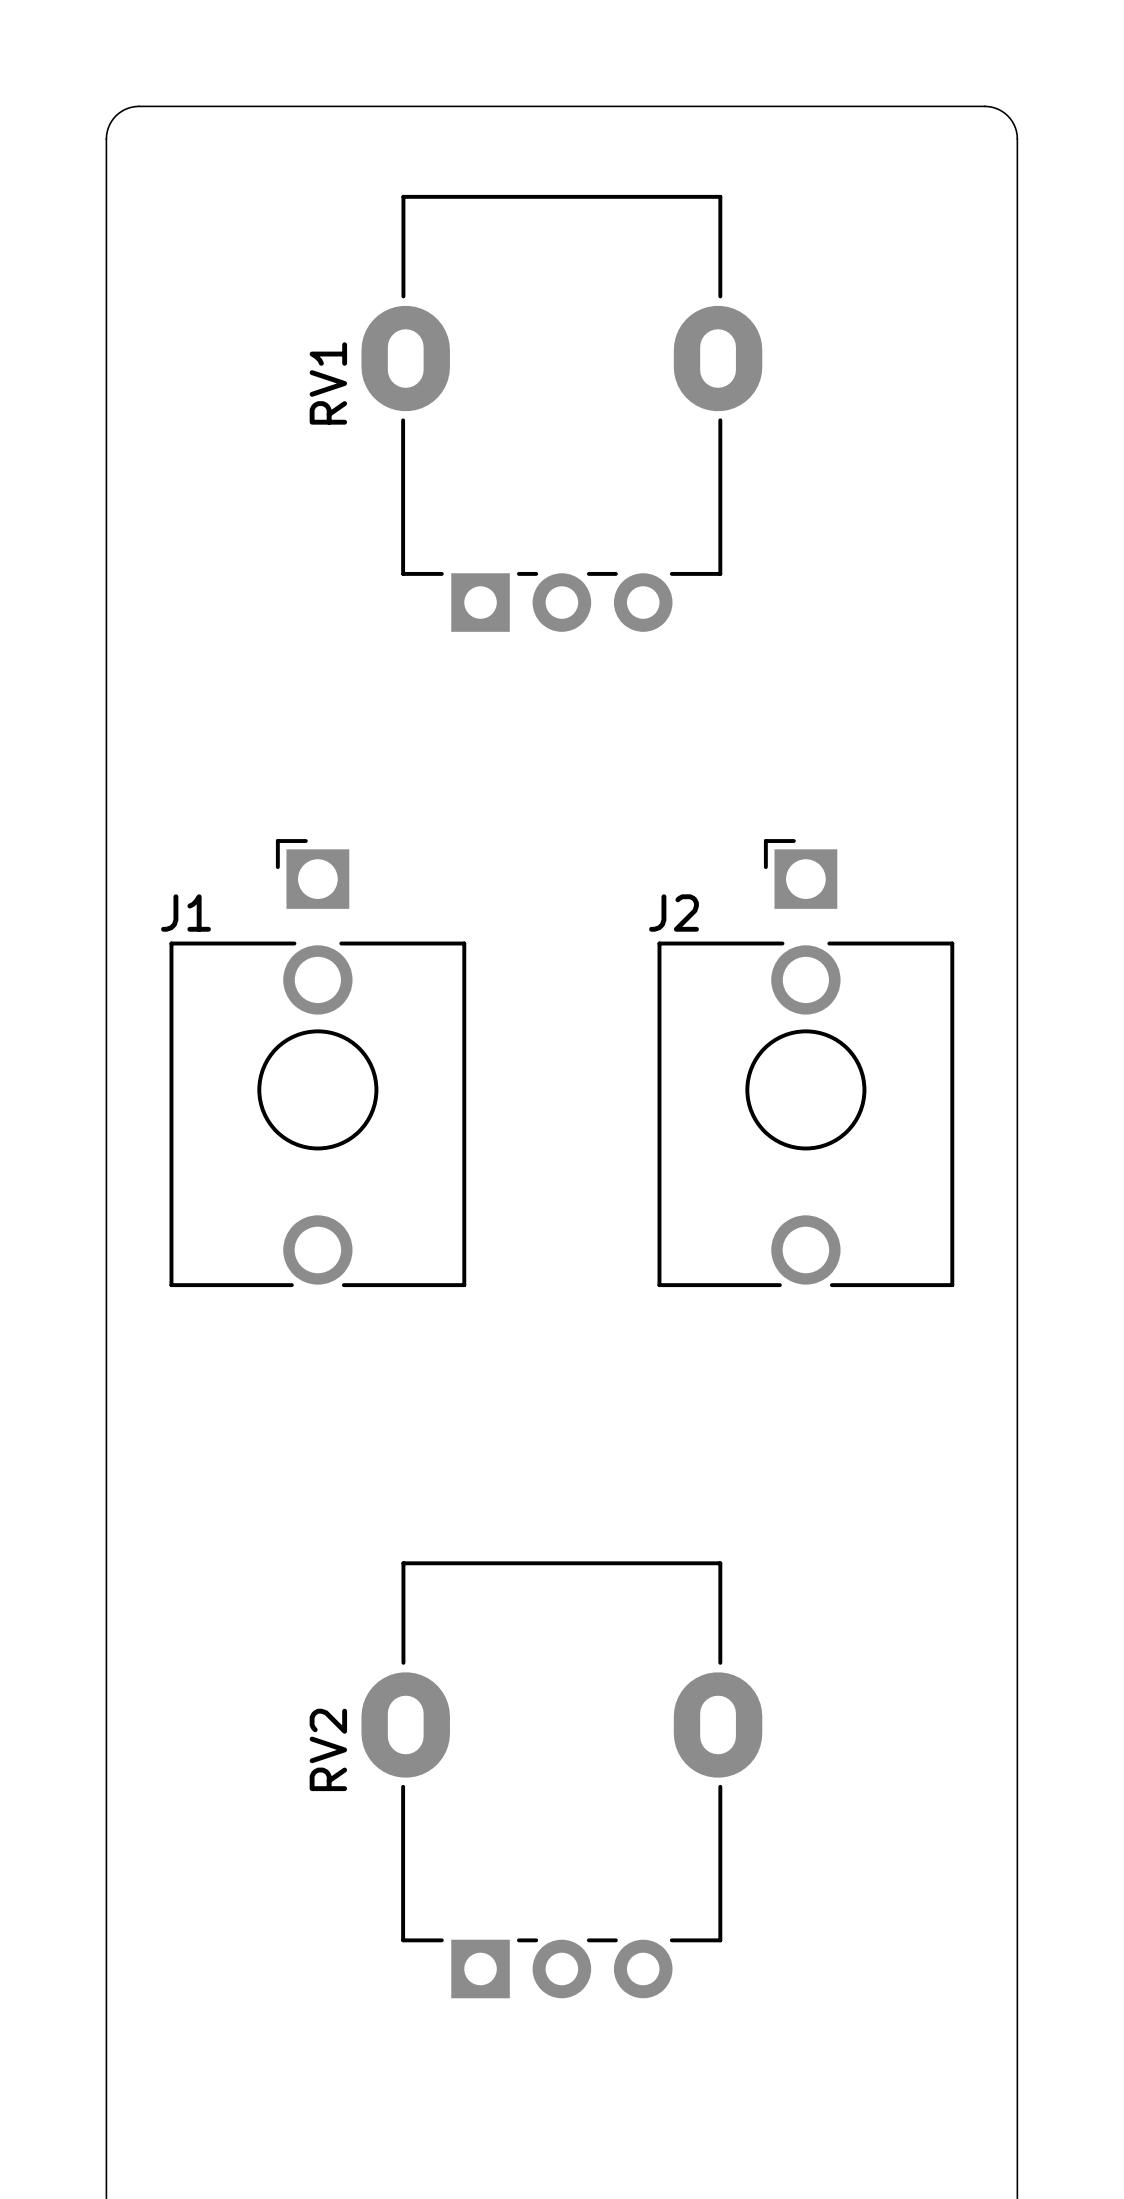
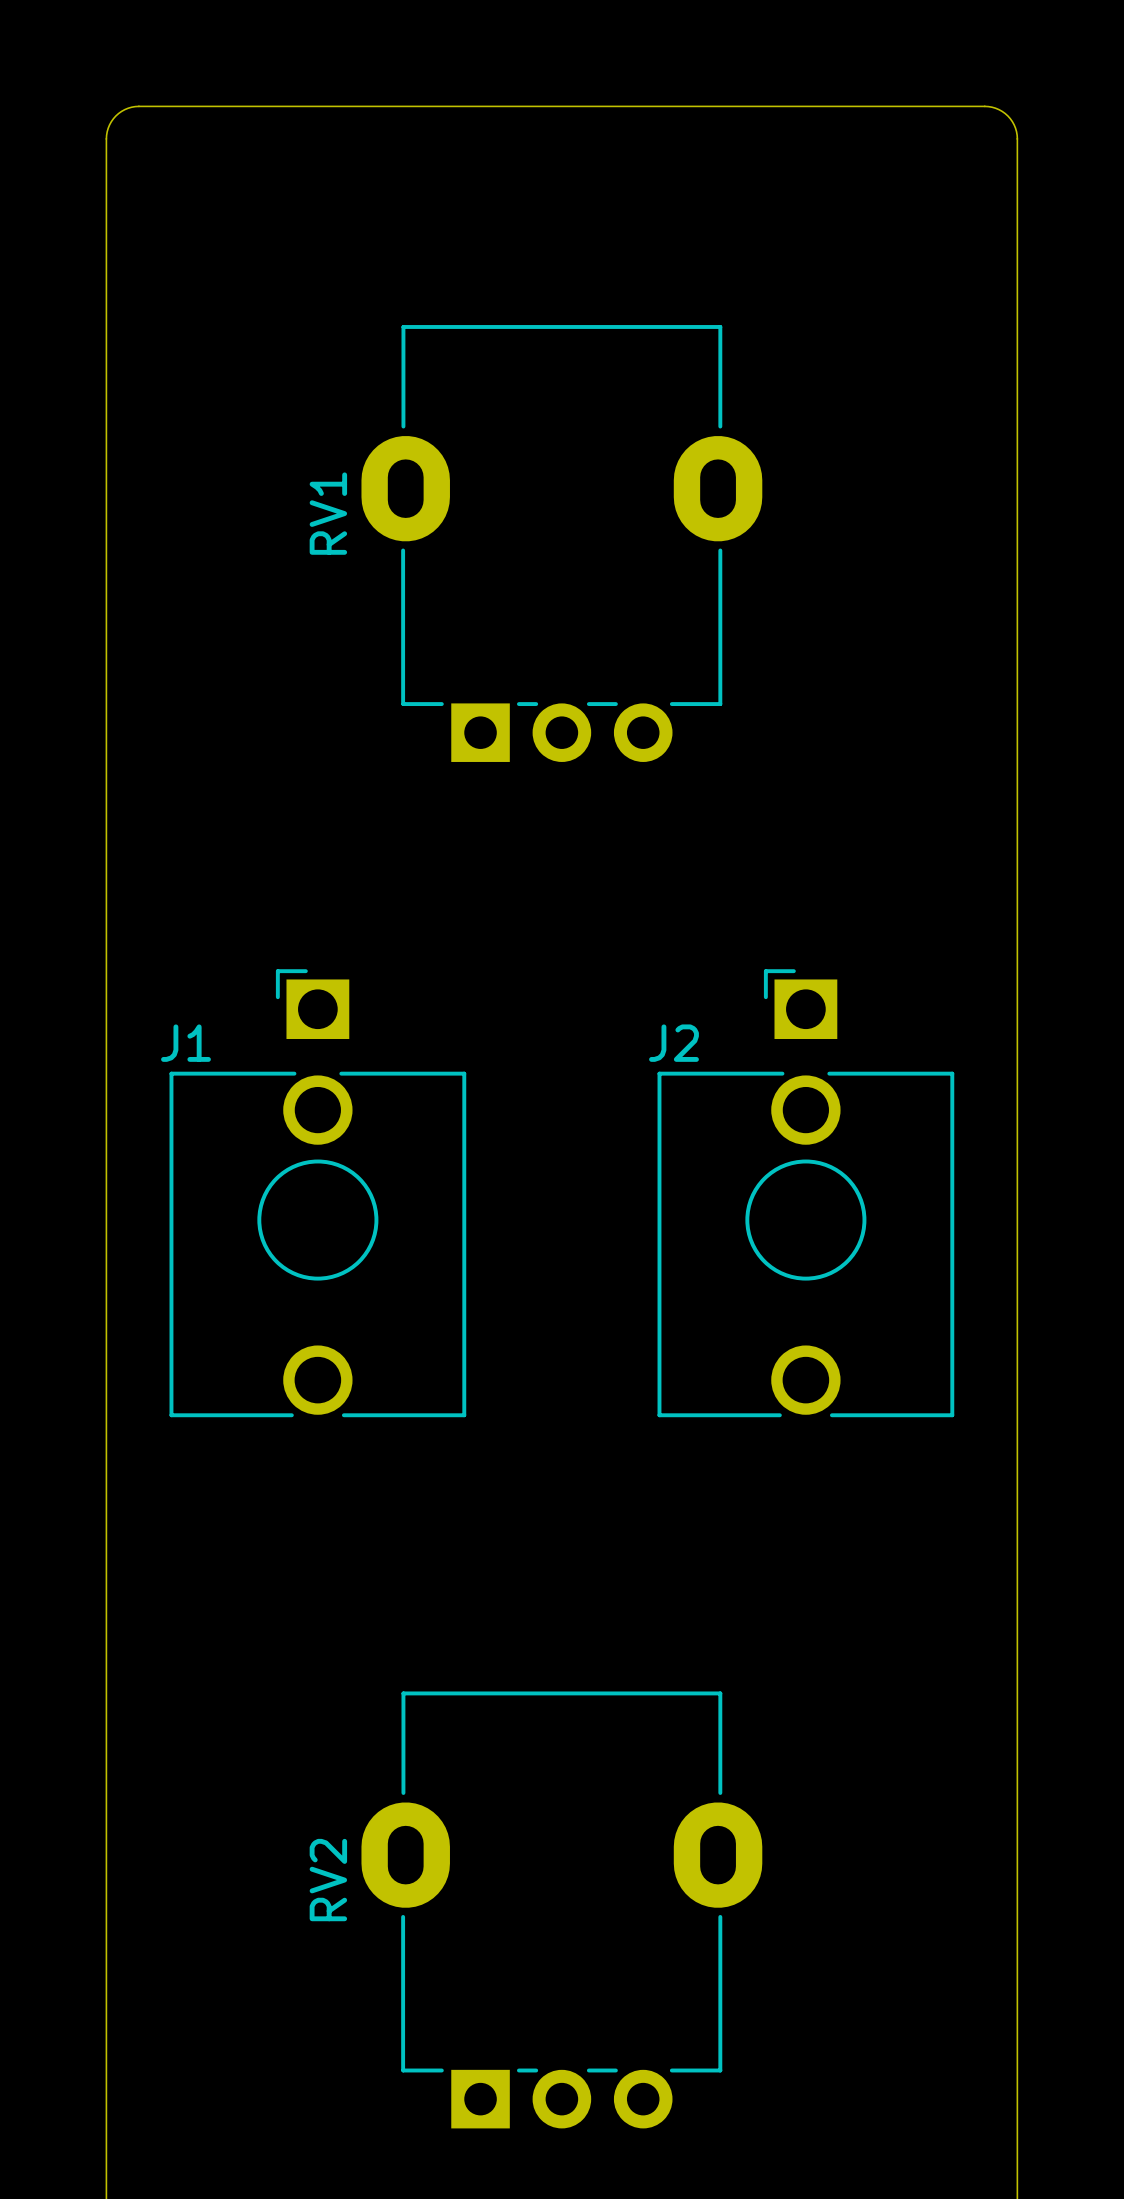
RV1 position: (561, 413) -> (561, 543)
J1 position: (317, 1063) -> (317, 1193)
J2 position: (805, 1063) -> (805, 1193)
RV2 position: (561, 1779) -> (561, 1909)

